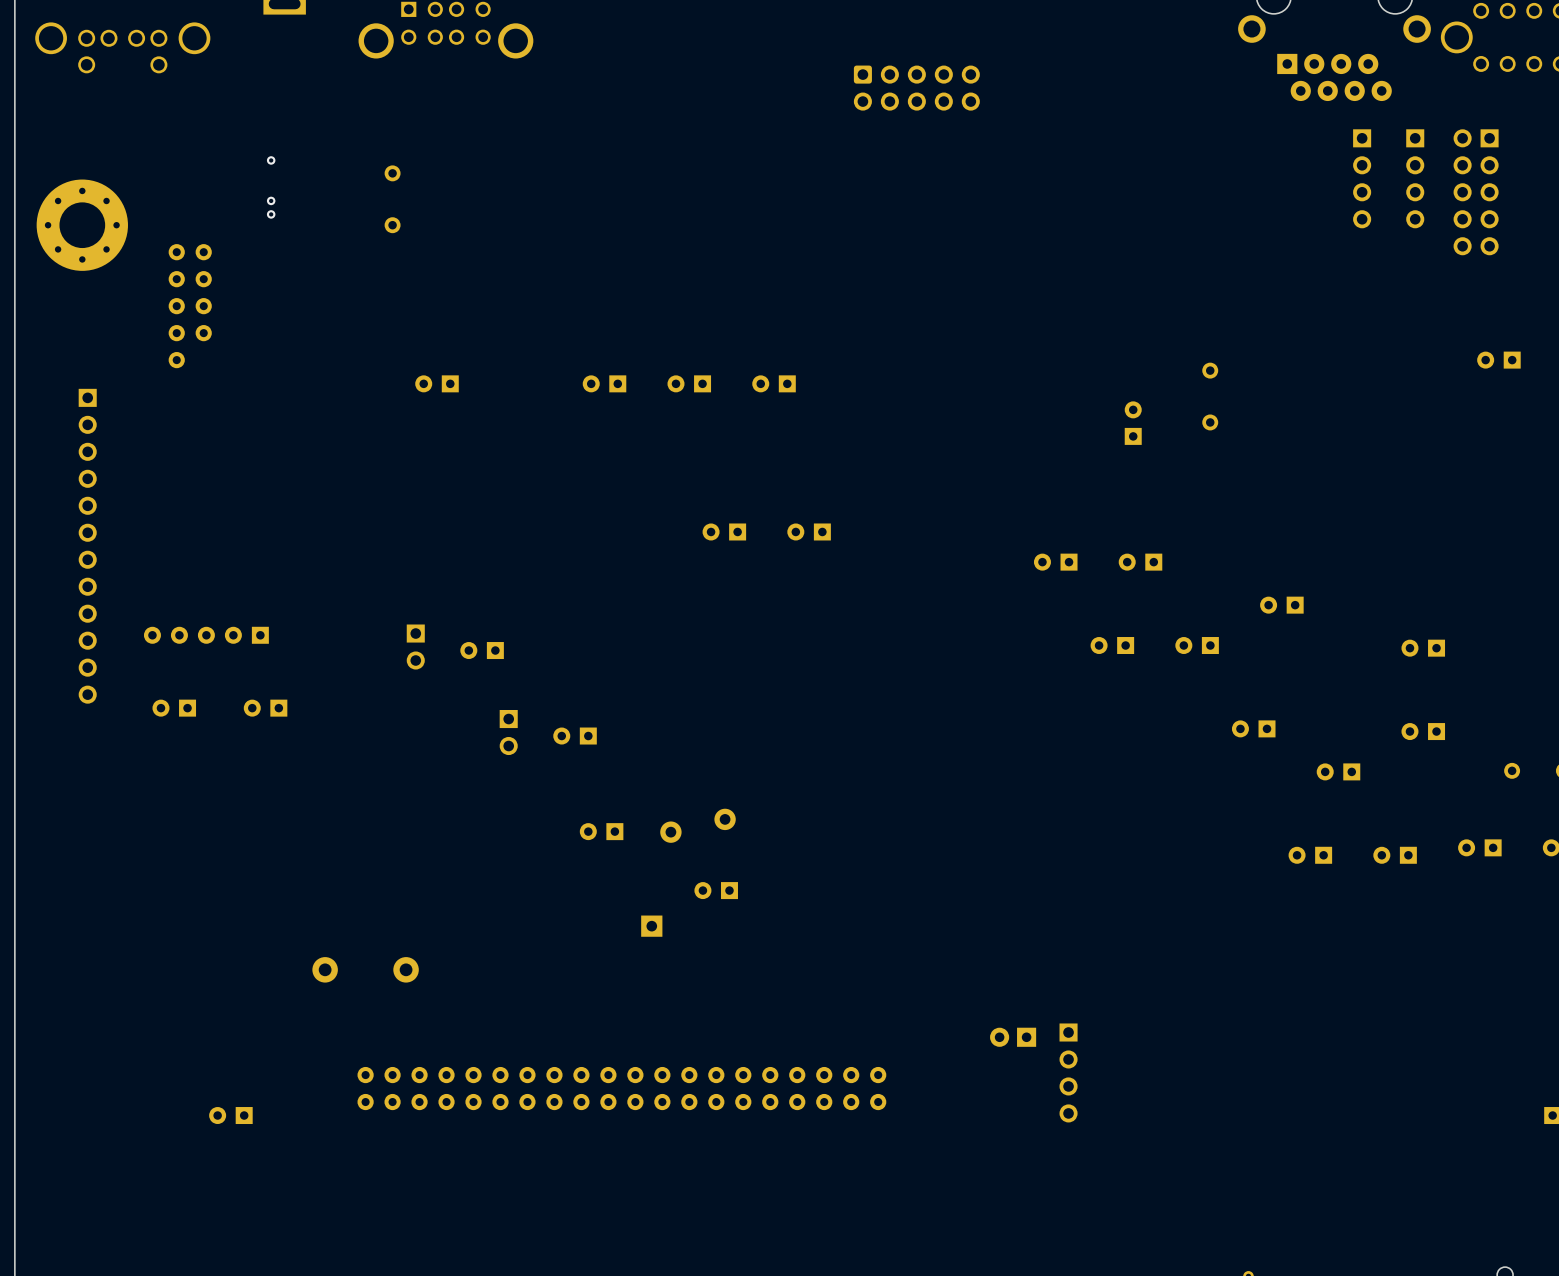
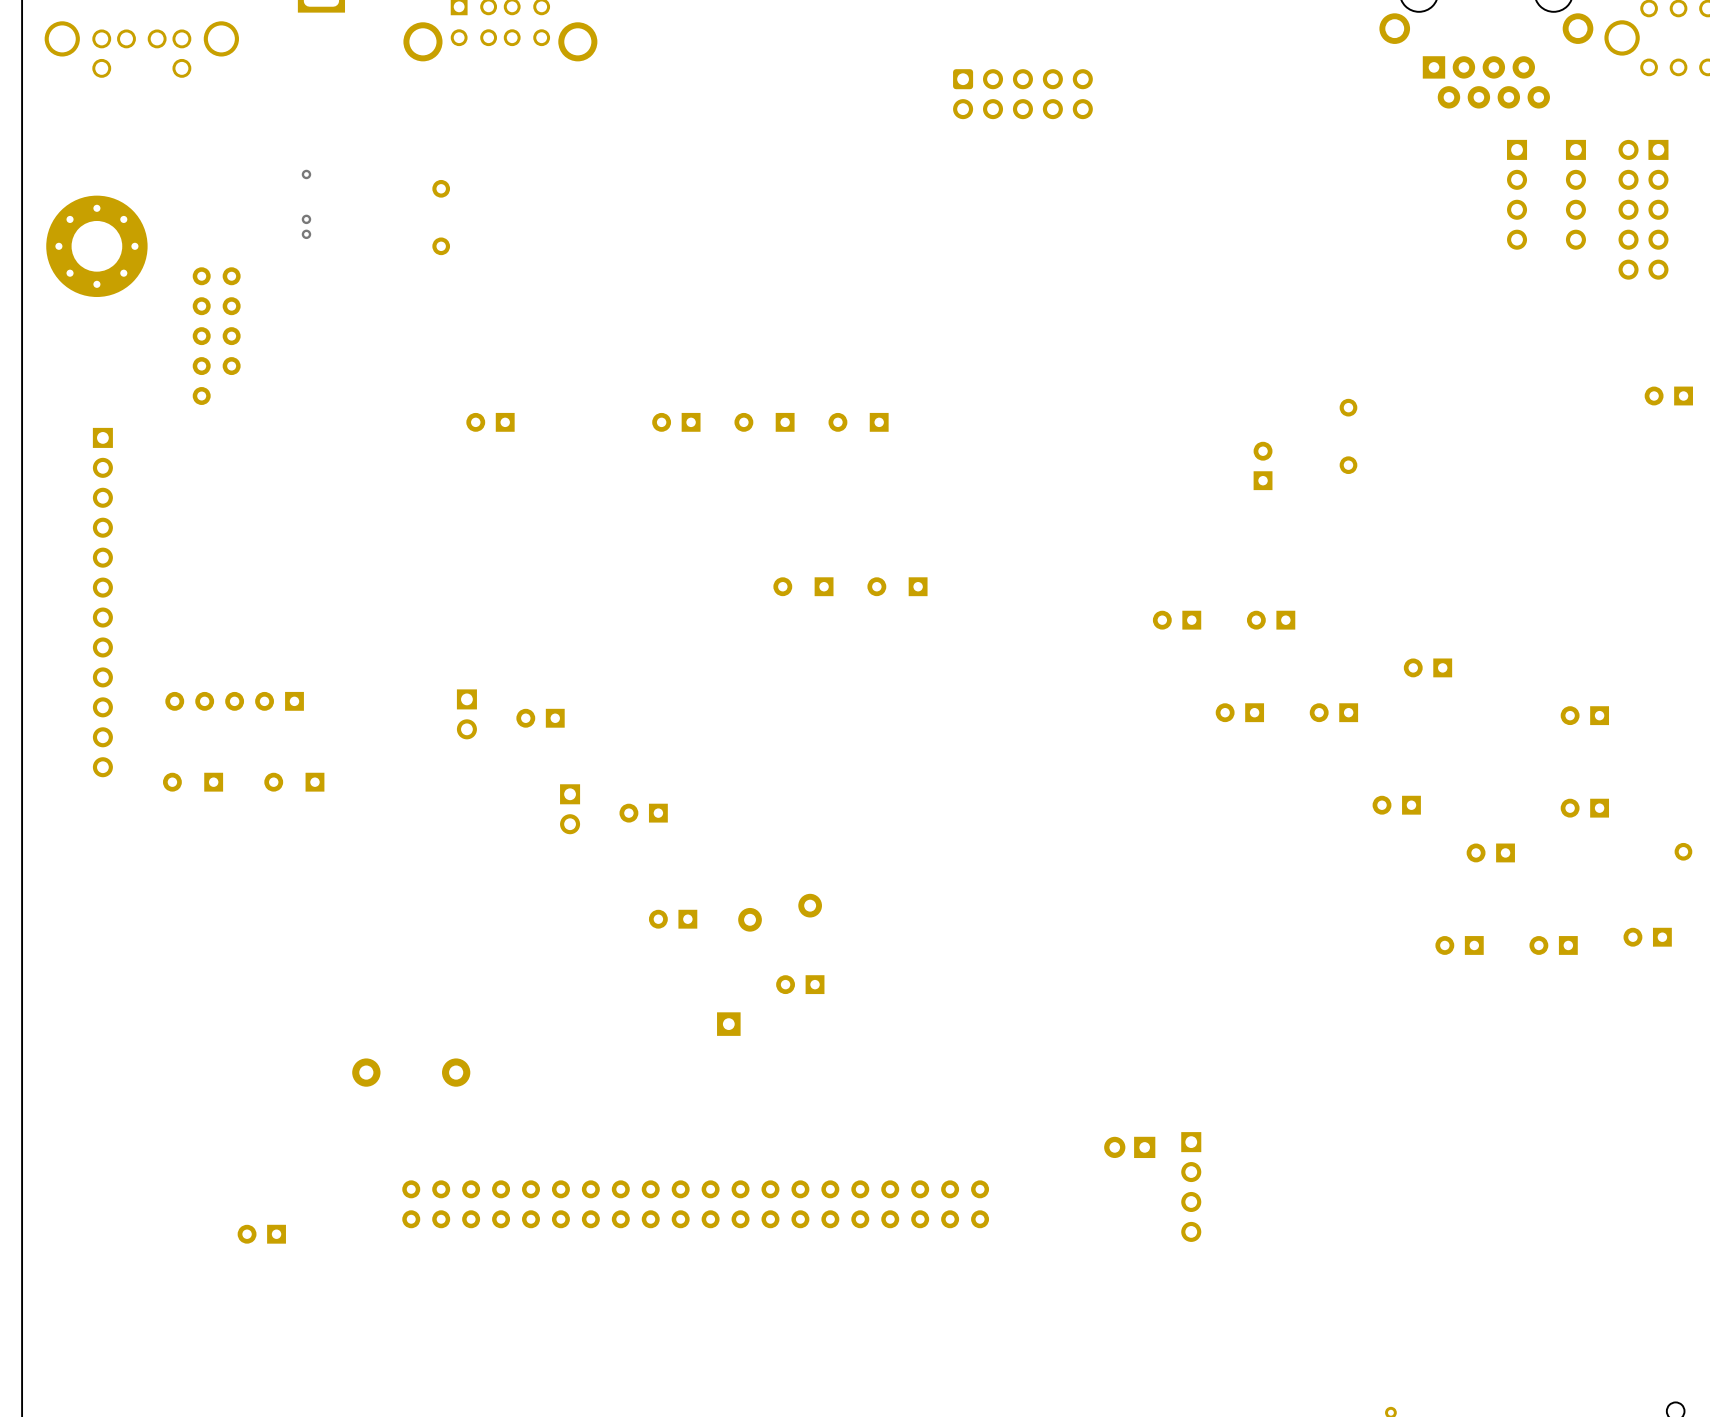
part footprint: [667, 375, 712, 393] -> [734, 412, 795, 432]
part footprint: [752, 375, 796, 393] -> [828, 412, 889, 432]
part footprint: [702, 523, 747, 541] -> [773, 577, 834, 597]
part footprint: [787, 523, 831, 541] -> [867, 577, 928, 597]
part footprint: [152, 699, 197, 717] -> [162, 772, 224, 792]
part footprint: [243, 699, 288, 717] -> [264, 772, 325, 792]

